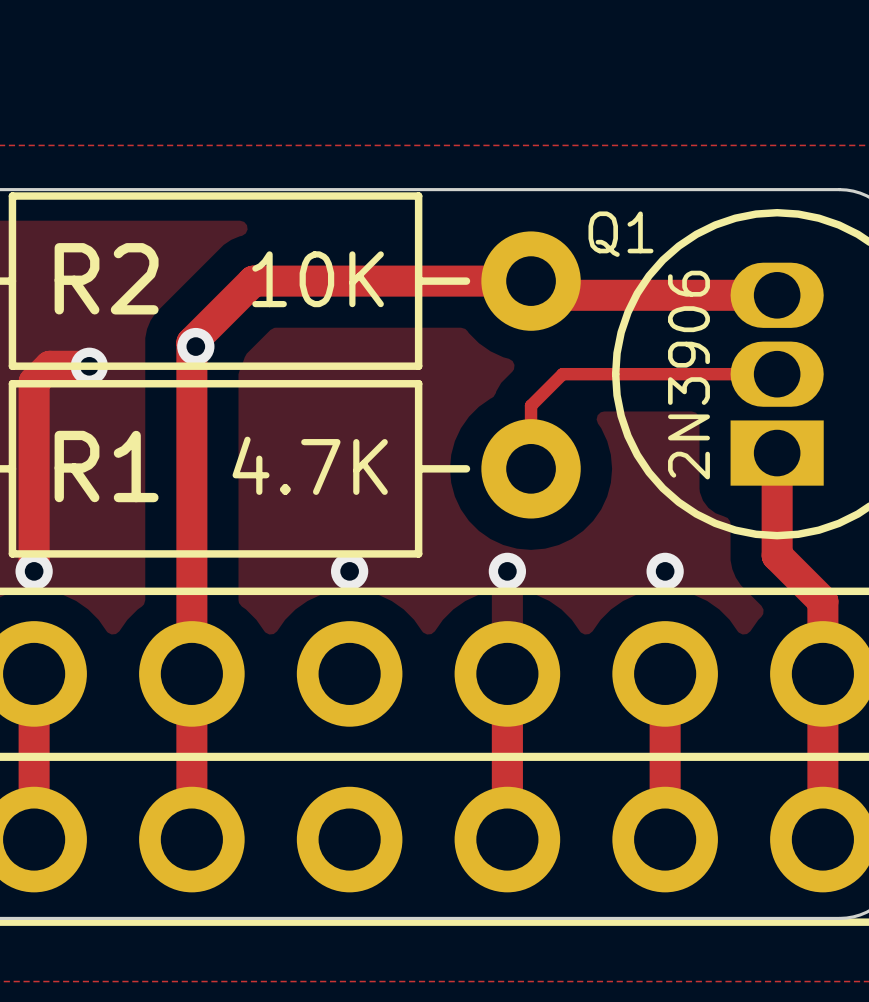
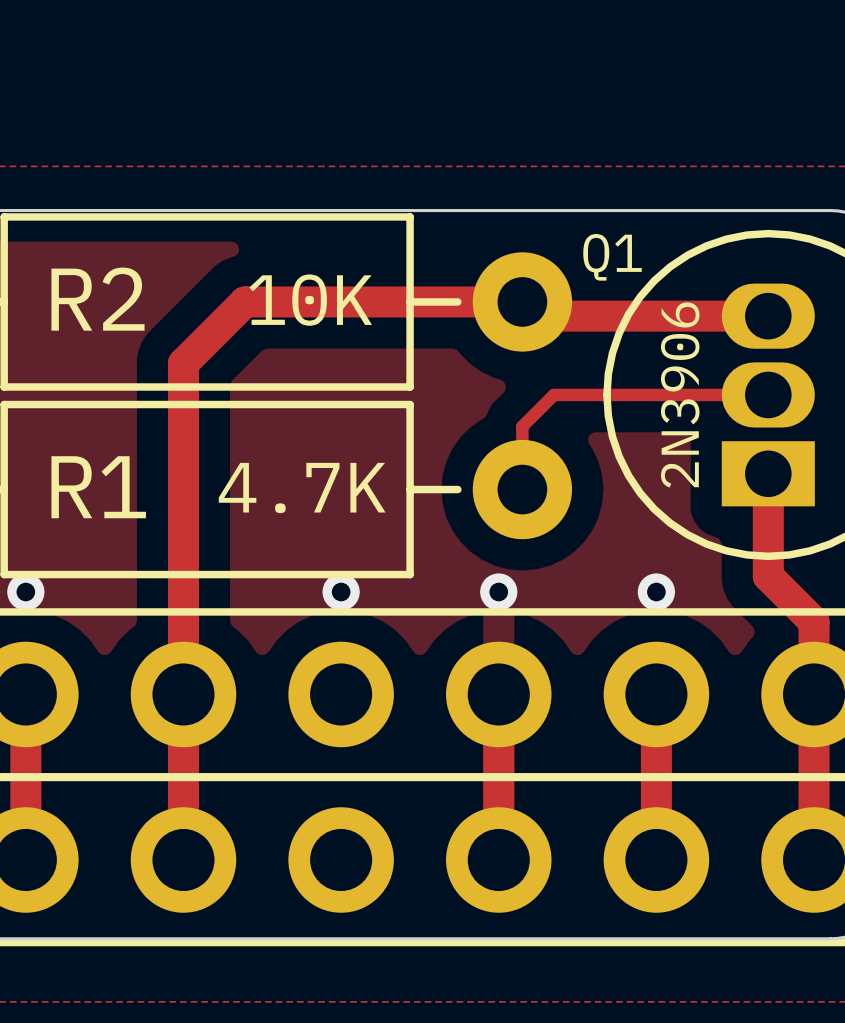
via: (195, 346) -> none
track: (89, 366) (49, 366) (34, 382) (34, 571) -> none
via: (89, 366) -> none

